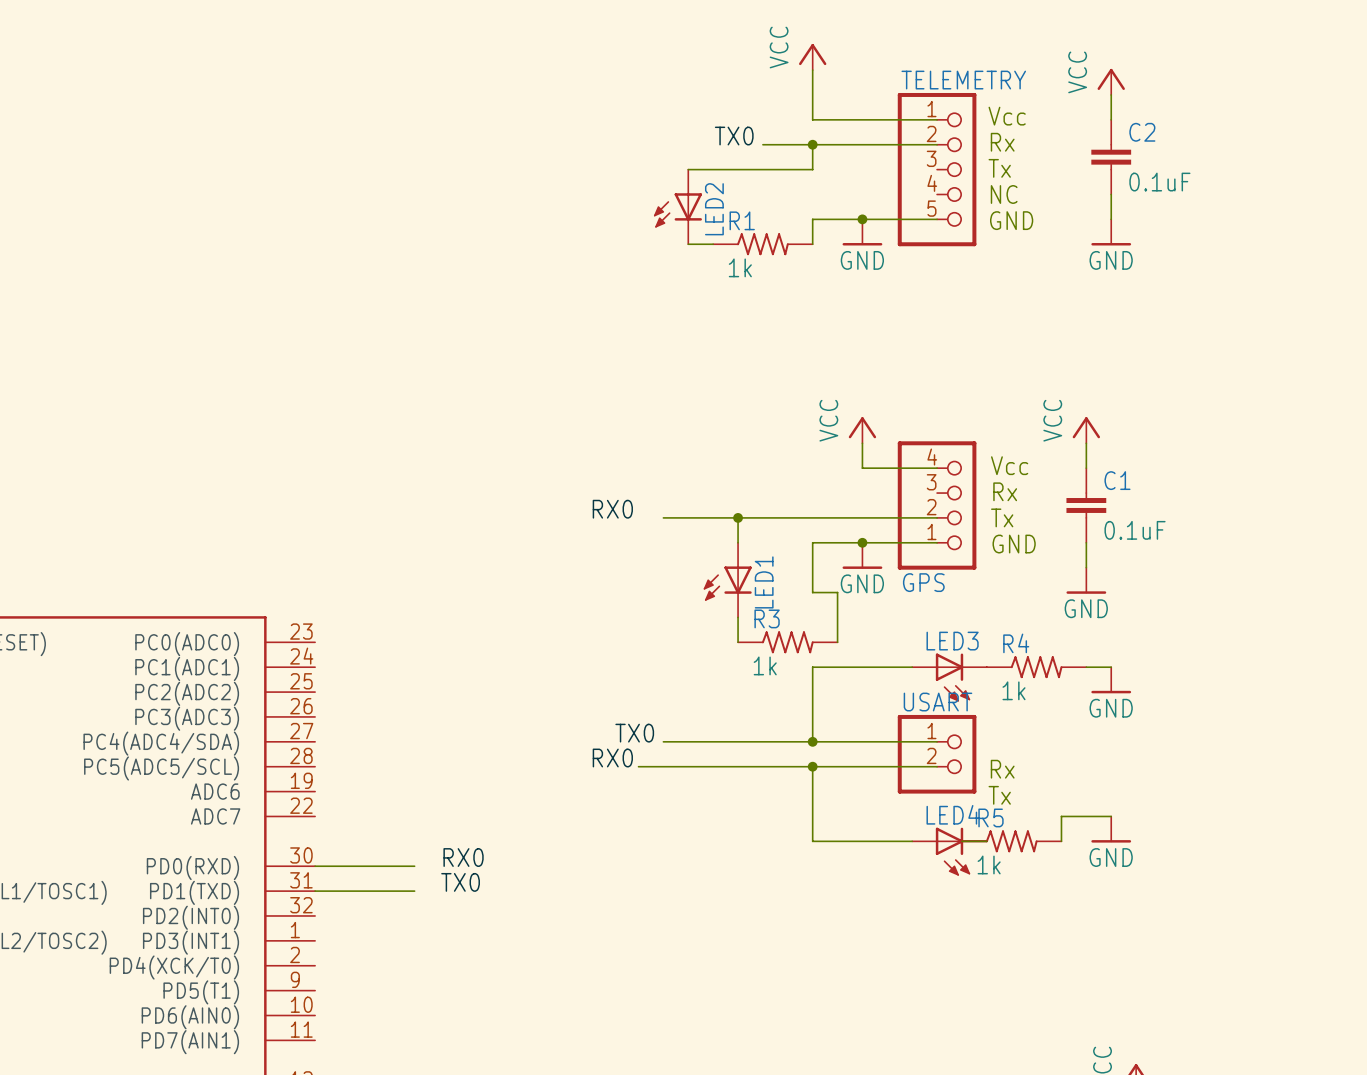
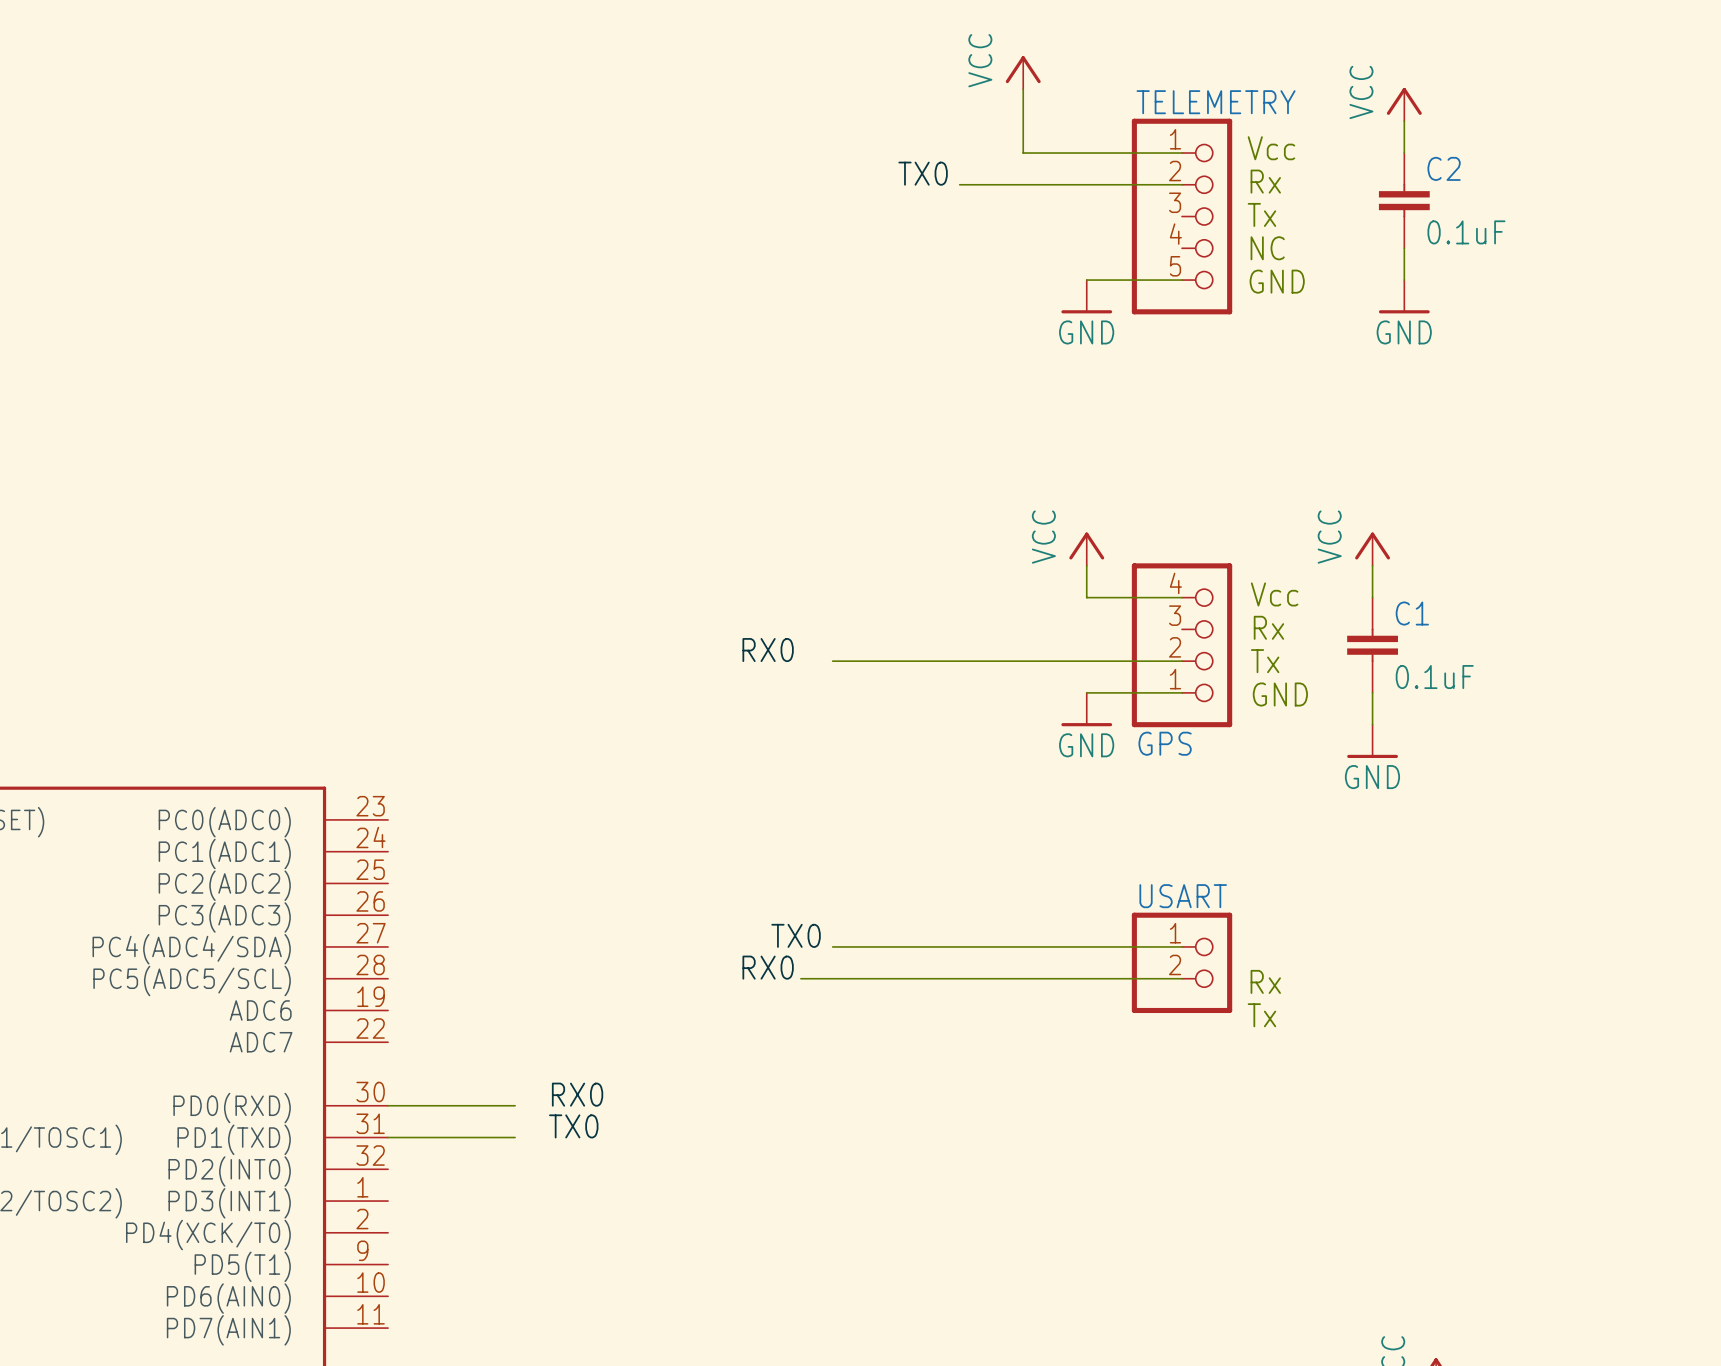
wire: (812, 144) (812, 169) (688, 169) -> none
junction: (812, 144) -> none
LED2: (677, 206) -> none
wire: (862, 219) (812, 219) (812, 244) -> none
junction: (862, 219) -> none
wire: (688, 244) (713, 244) -> none
R1: 1k (762, 244) -> none
wire: (738, 517) (738, 542) -> none
junction: (738, 517) -> none
wire: (862, 542) (812, 542) (812, 592) (837, 592) (837, 642) -> none
junction: (862, 542) -> none
LED1: (727, 580) -> none
wire: (738, 617) (738, 642) -> none
R3: 1k (787, 642) -> none
wire: (912, 667) (812, 667) (812, 741) -> none
R4: 1k (1036, 667) -> none
wire: (1086, 667) (1111, 667) -> none
LED3: (949, 677) -> none
power symbol: GND (1111, 680) -> none
junction: (812, 741) -> none
wire: (812, 766) (812, 841) (912, 841) -> none
junction: (812, 766) -> none
wire: (1111, 816) (1061, 816) (1061, 841) -> none
power symbol: GND (1111, 829) -> none
wire: (961, 841) (986, 841) -> none
R5: 1k (1011, 841) -> none
LED4: (949, 851) -> none

